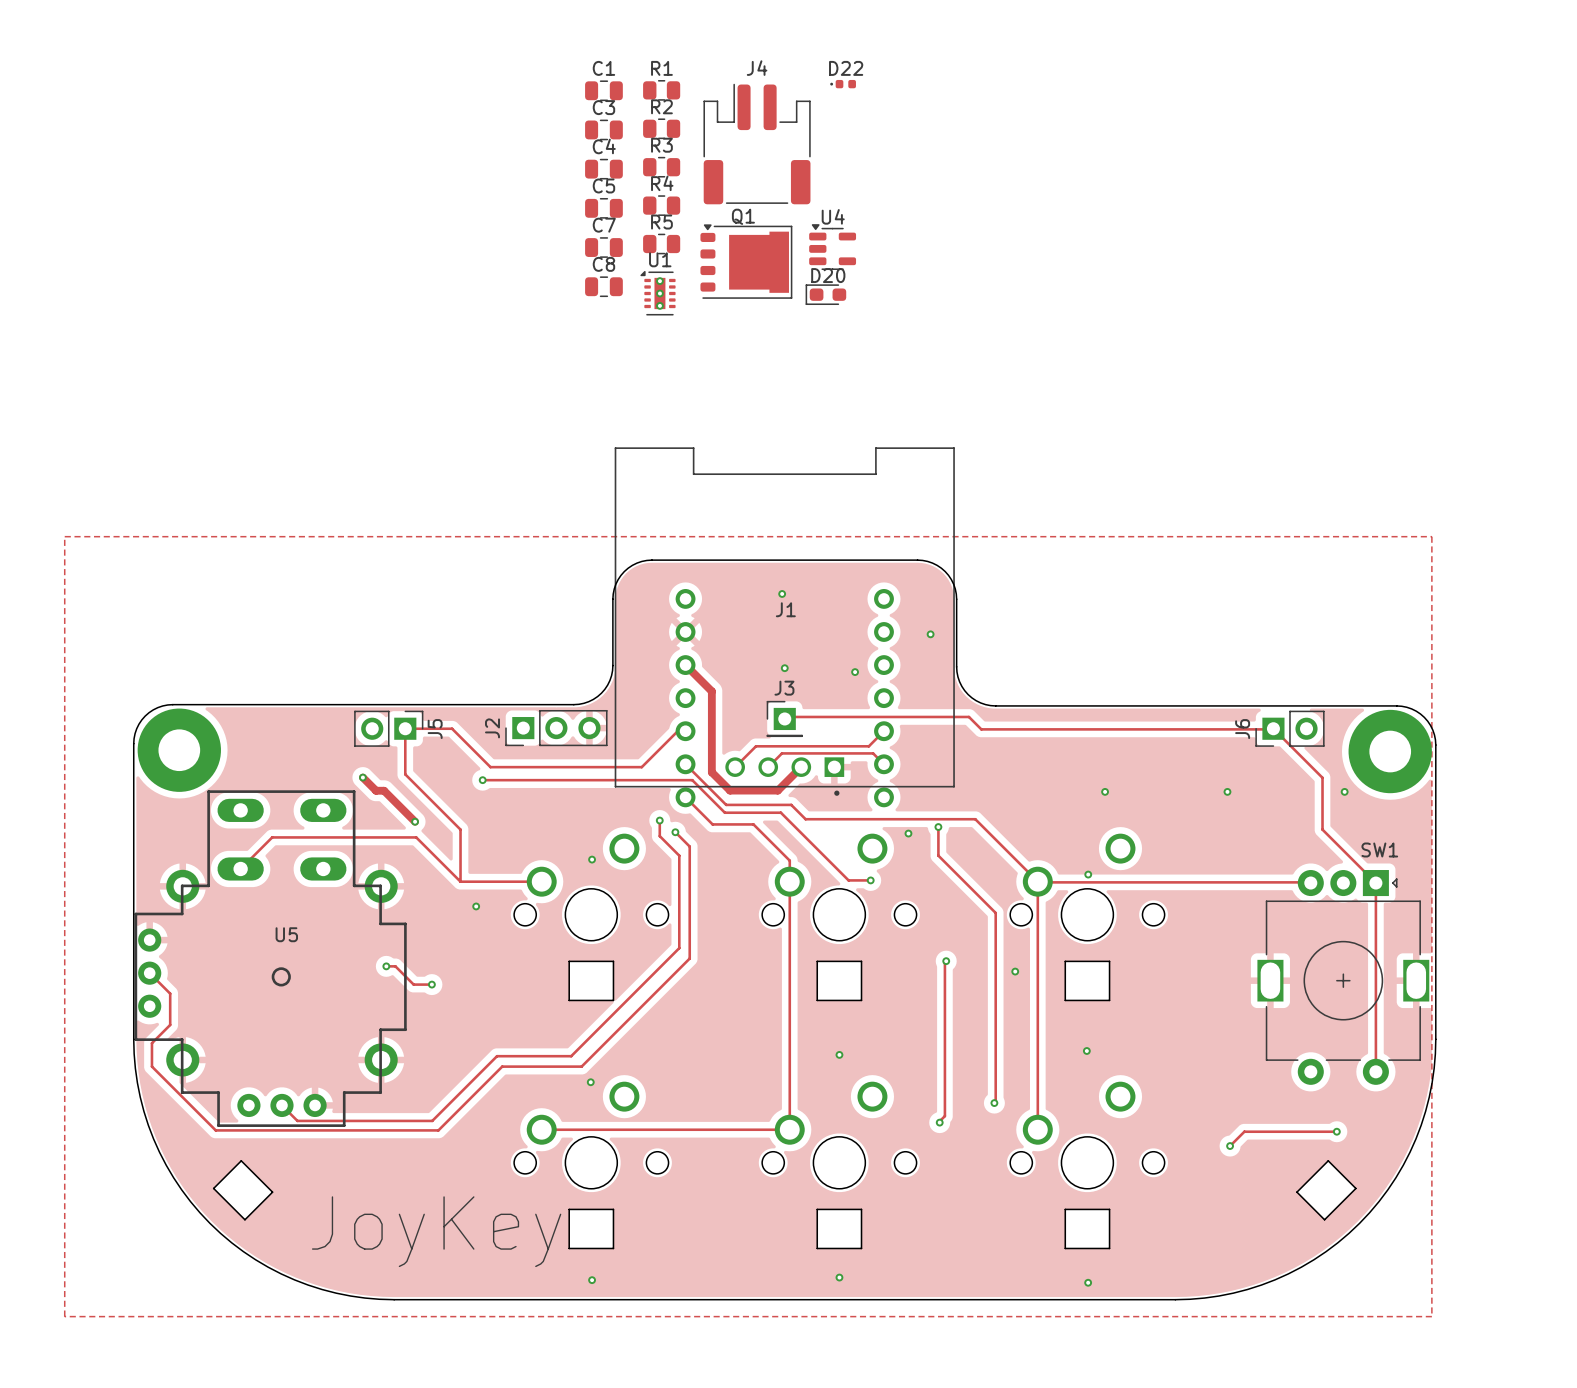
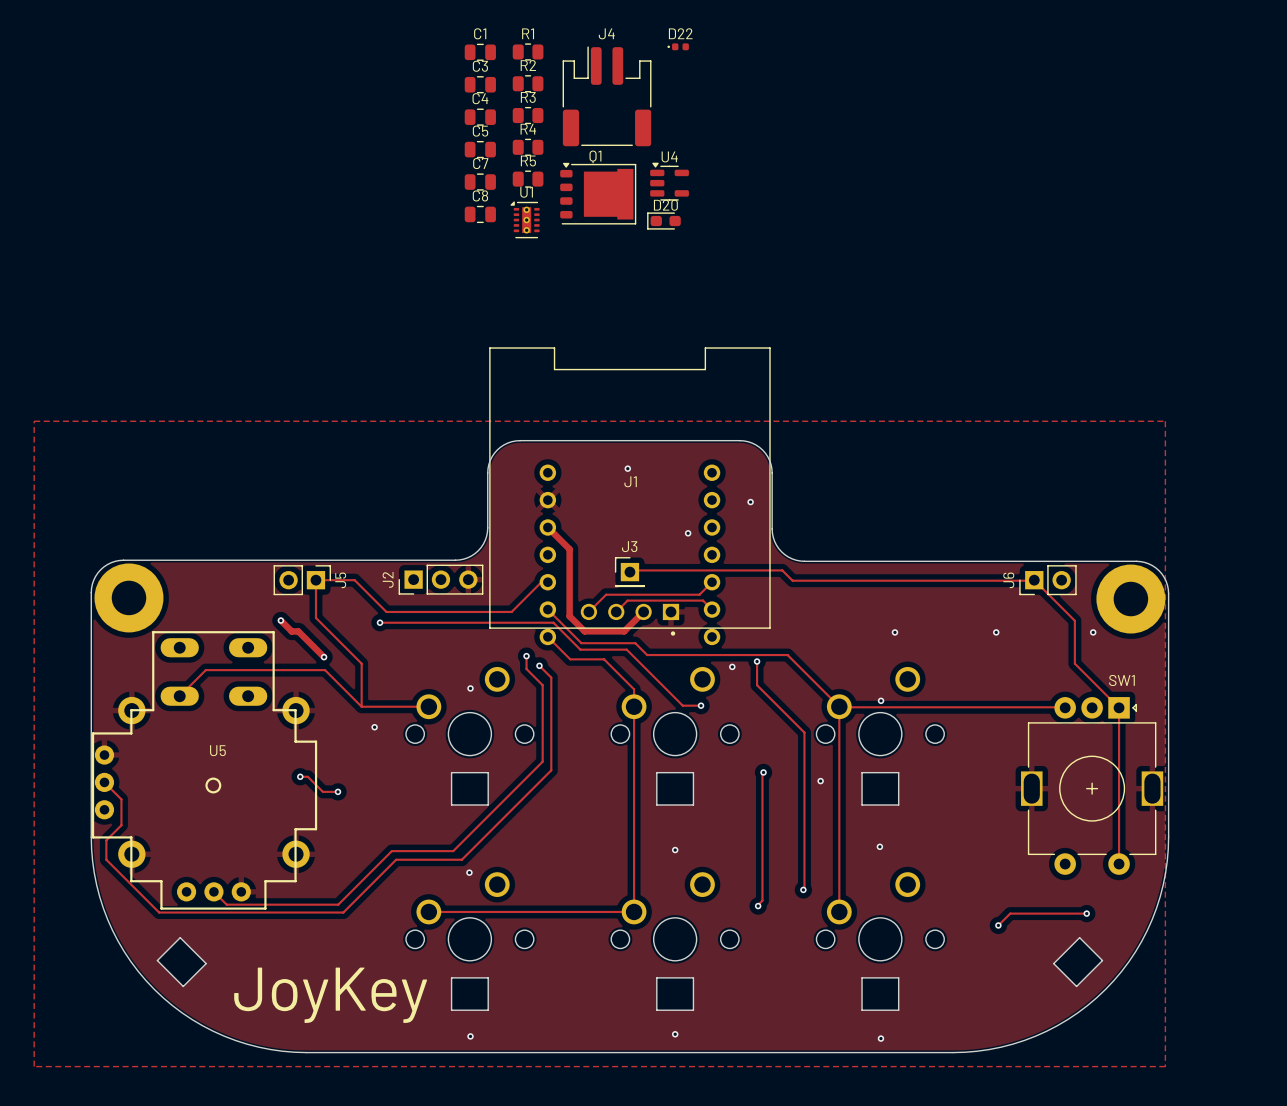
via: (784, 668) -> none

